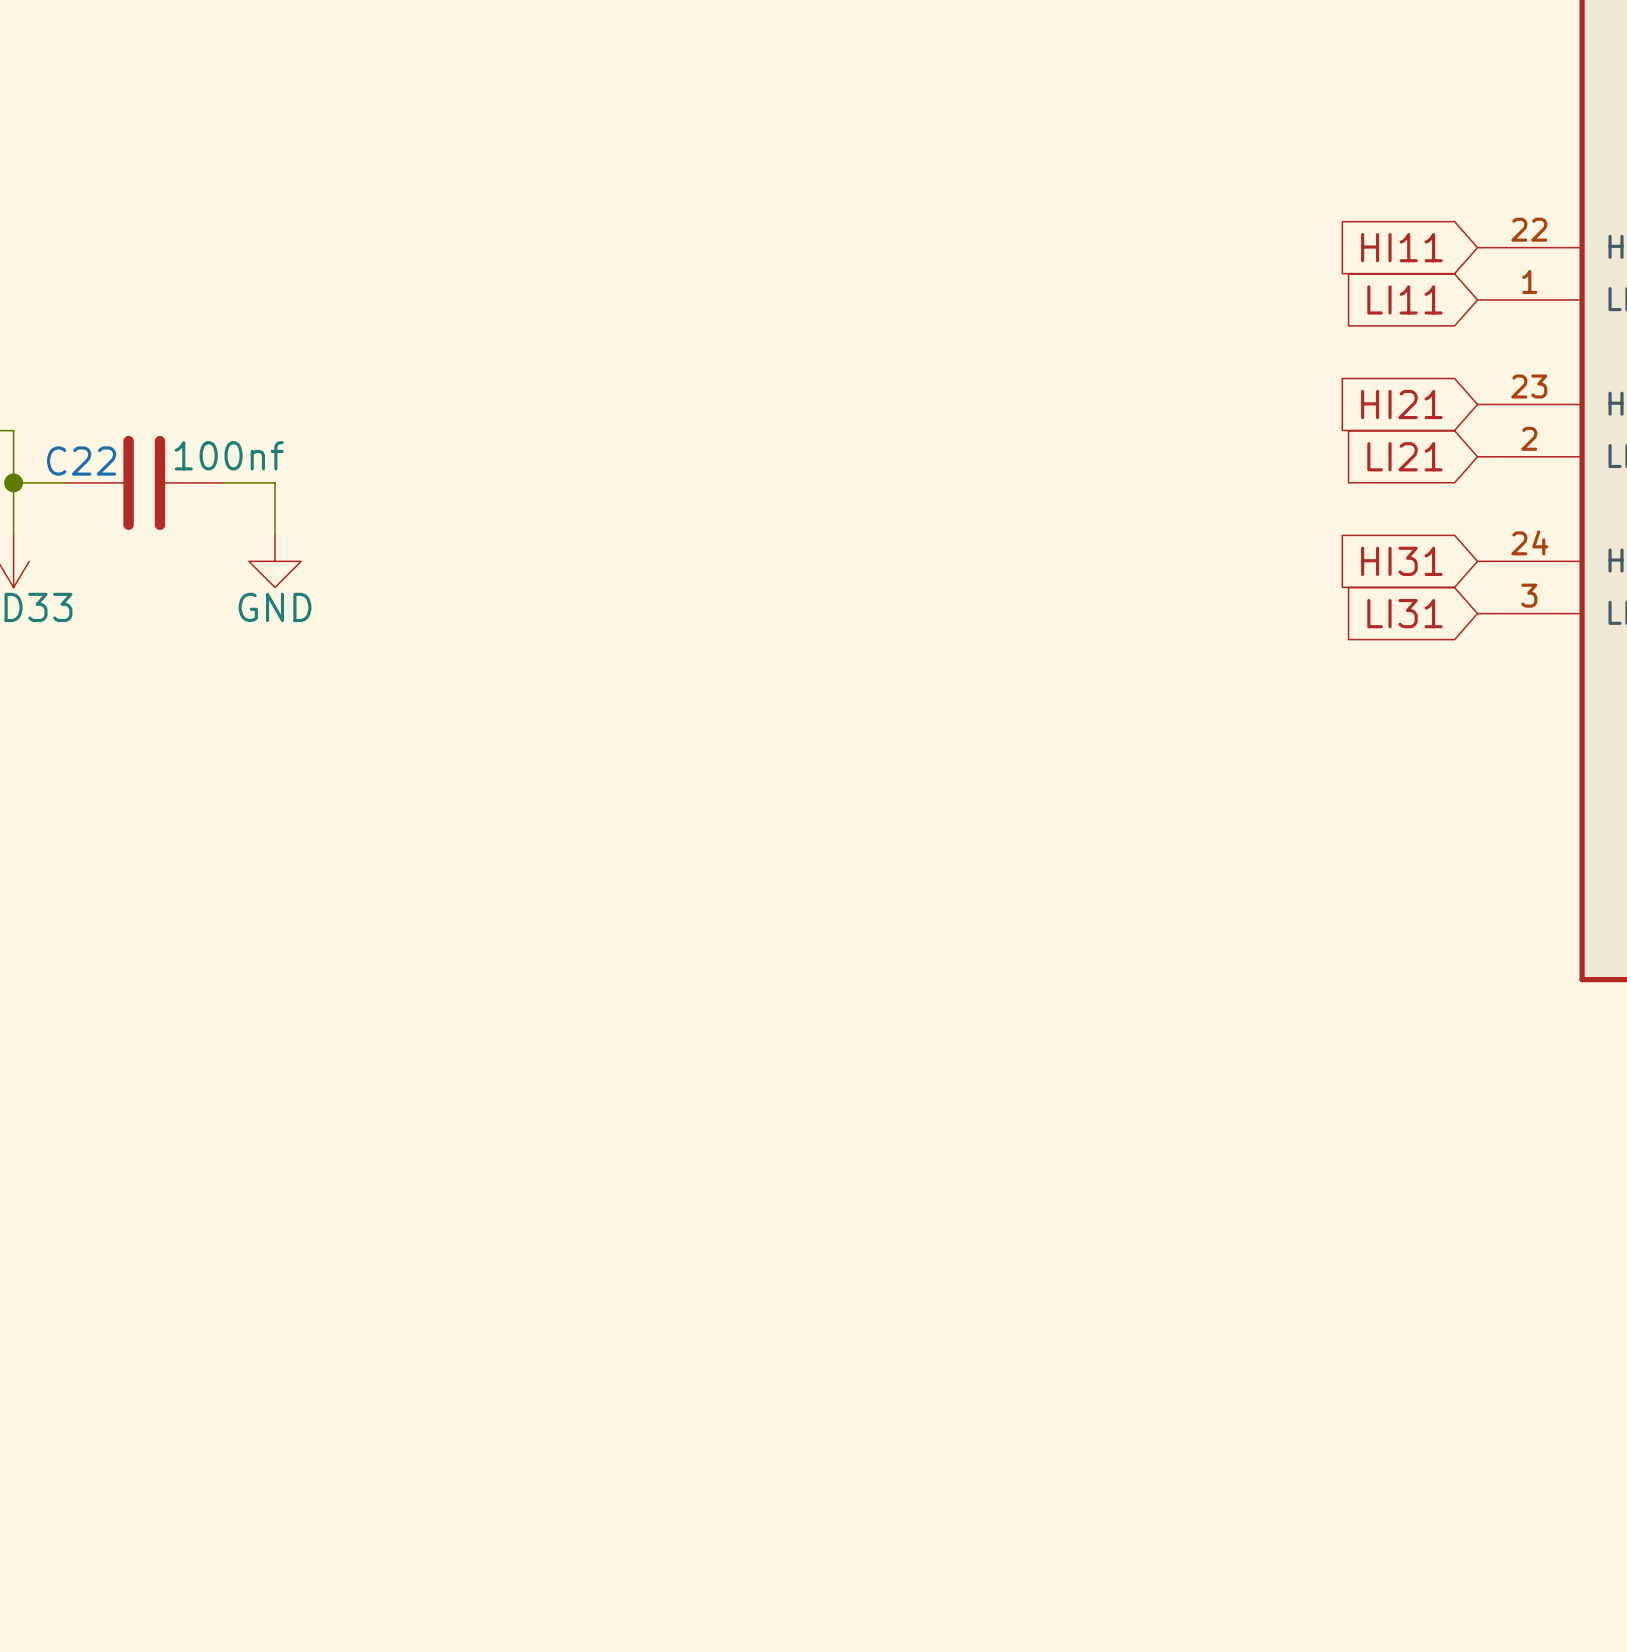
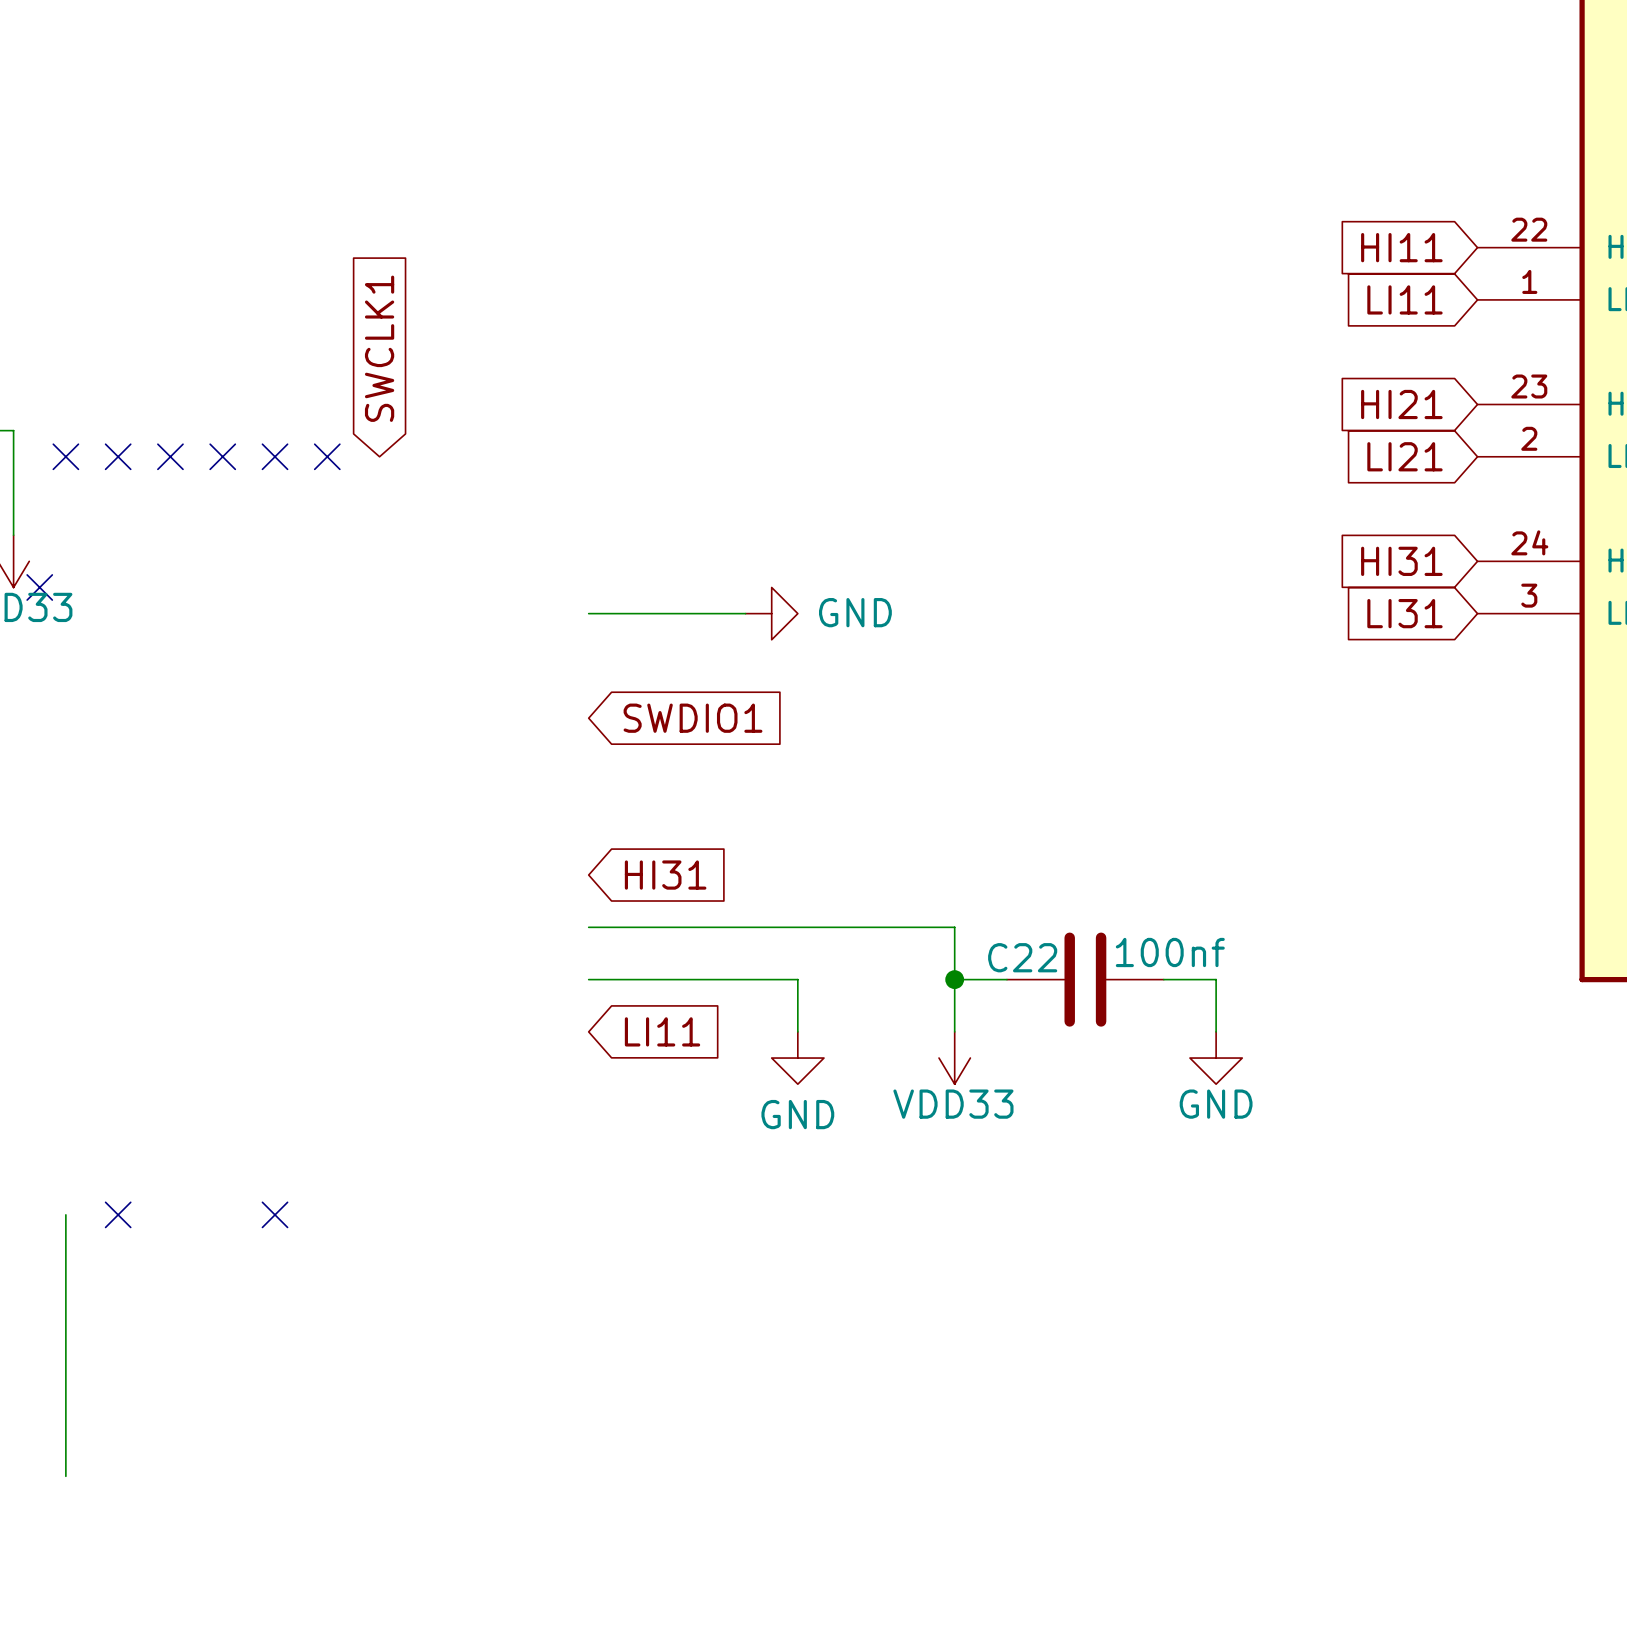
global label: none -> SWCLK1 (379, 348)
no-connect mark: none -> (65, 456)
no-connect mark: none -> (118, 456)
no-connect mark: none -> (170, 456)
no-connect mark: none -> (222, 456)
no-connect mark: none -> (275, 456)
no-connect mark: none -> (327, 456)
wire: (13, 482) (65, 482) -> none
junction: (13, 482) -> none
C22 position: (144, 482) -> (1085, 979)
wire: (222, 482) (275, 482) (275, 535) -> none
power symbol: GND (275, 561) -> none
no-connect mark: none -> (39, 587)
wire: none -> (588, 613) (745, 613)
power symbol: none -> GND (771, 613)
global label: none -> SWDIO1 (693, 718)
global label: none -> HI31 (665, 875)
wire: none -> (588, 927) (954, 927) (954, 1031)
wire: none -> (588, 979) (797, 979) (797, 1031)
wire: none -> (954, 979) (1006, 979)
junction: none -> (954, 979)
wire: none -> (1163, 979) (1216, 979) (1216, 1031)
global label: none -> LI11 (662, 1031)
power symbol: none -> GND (797, 1058)
power symbol: none -> VDD33 (954, 1058)
power symbol: none -> GND (1216, 1058)
wire: none -> (65, 1214) (65, 1476)
no-connect mark: none -> (118, 1214)
no-connect mark: none -> (275, 1214)

